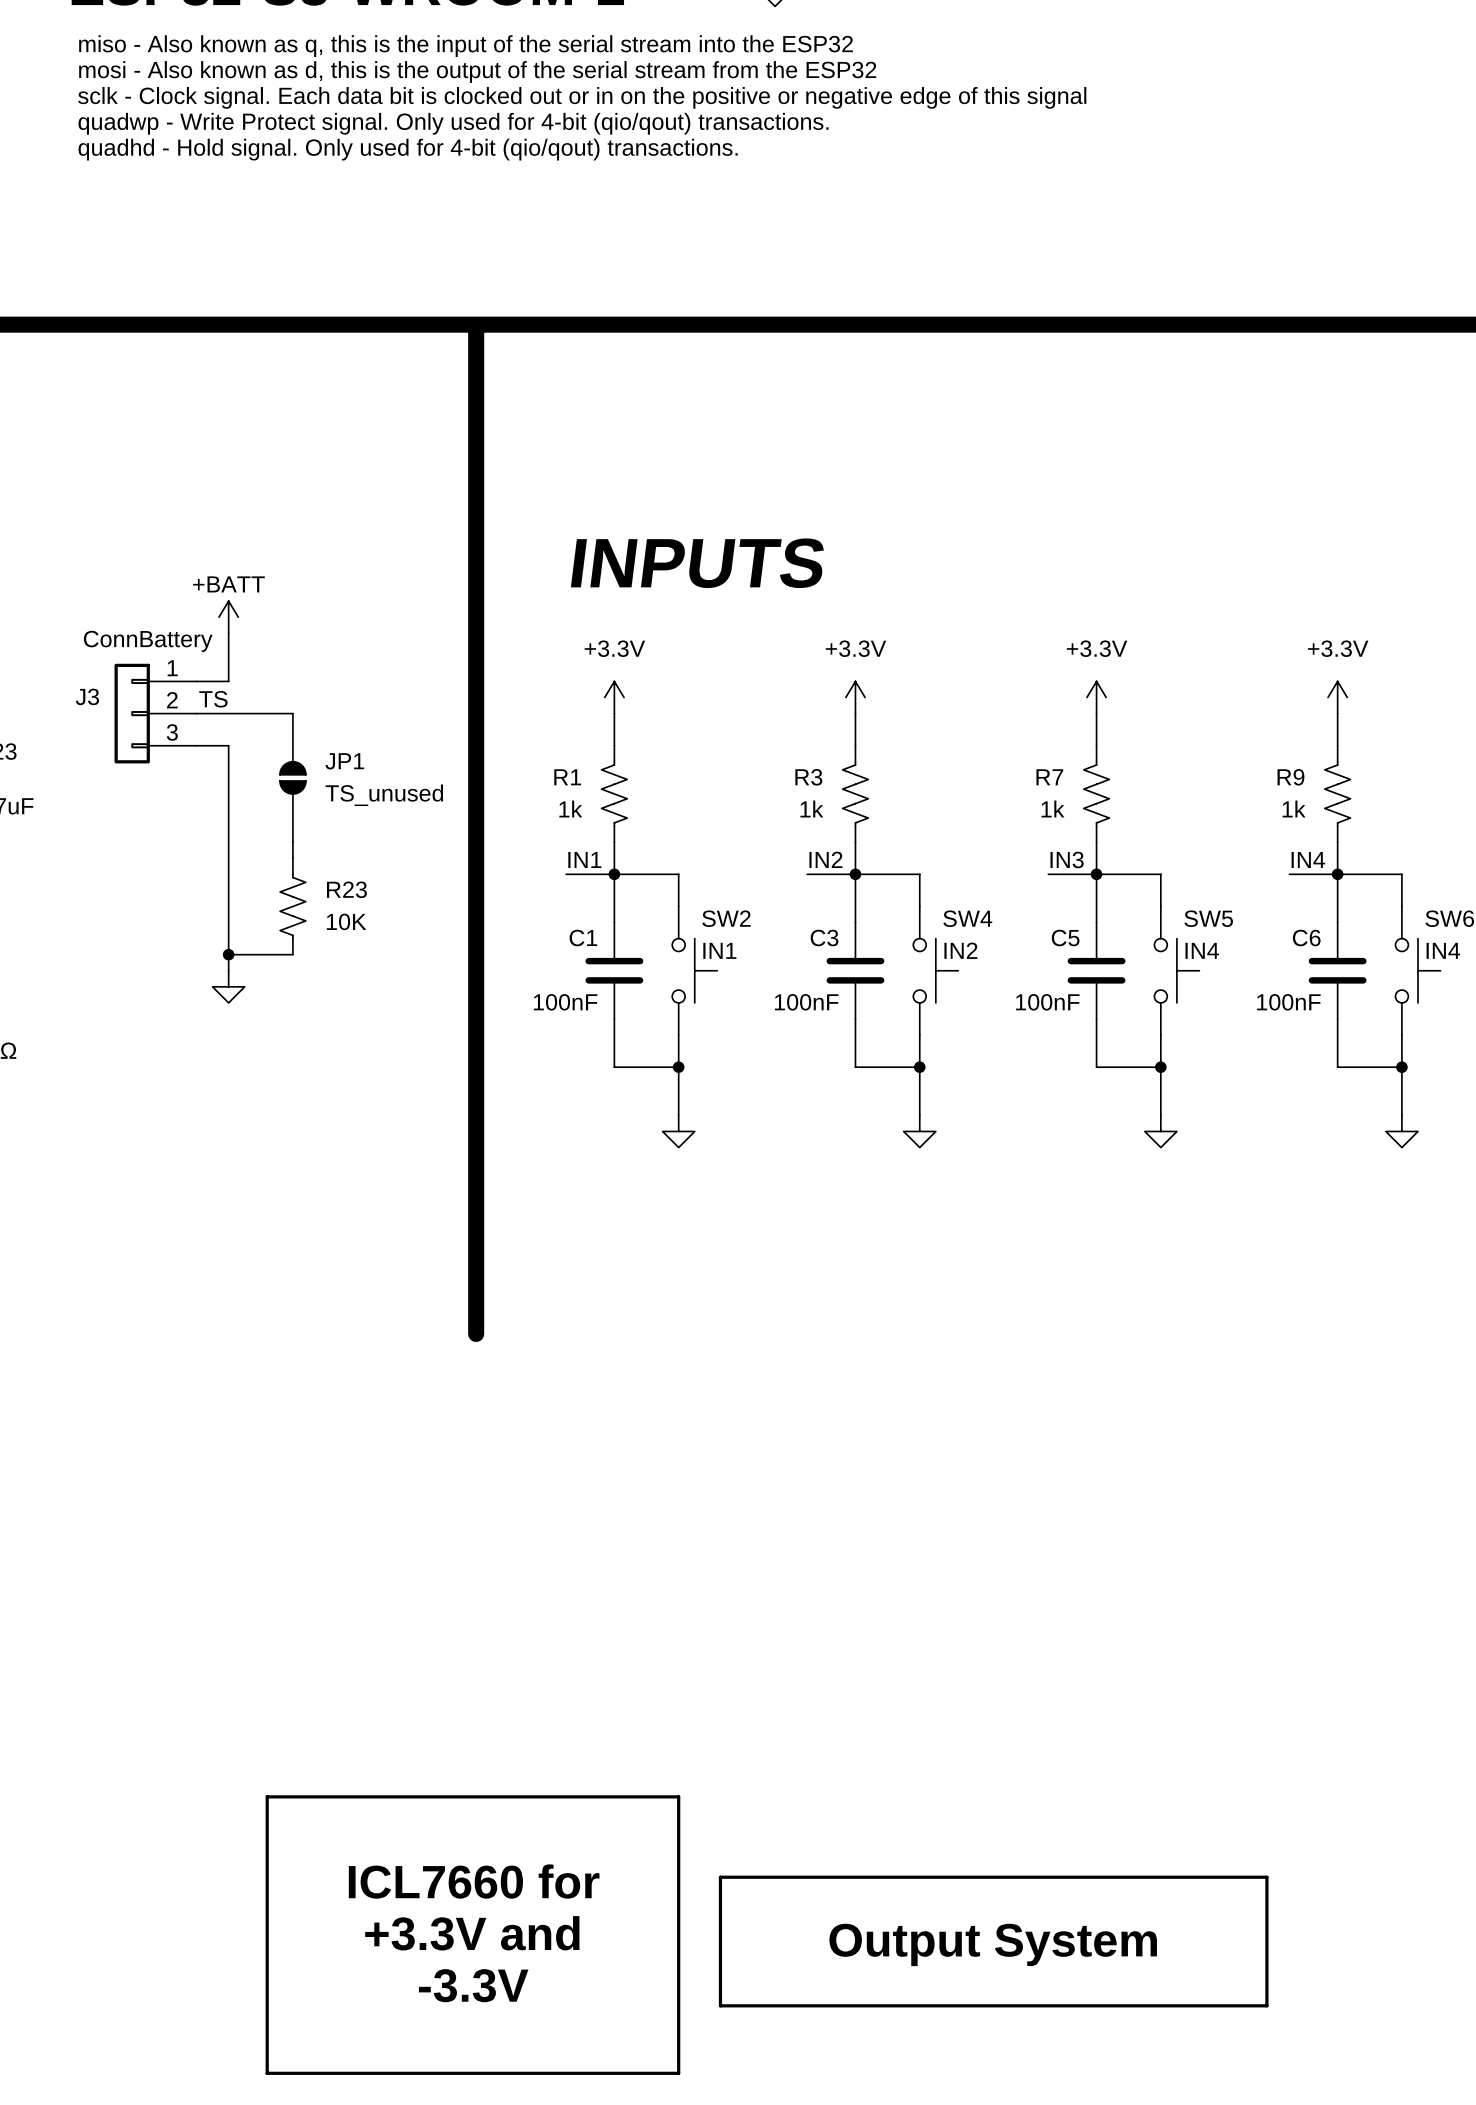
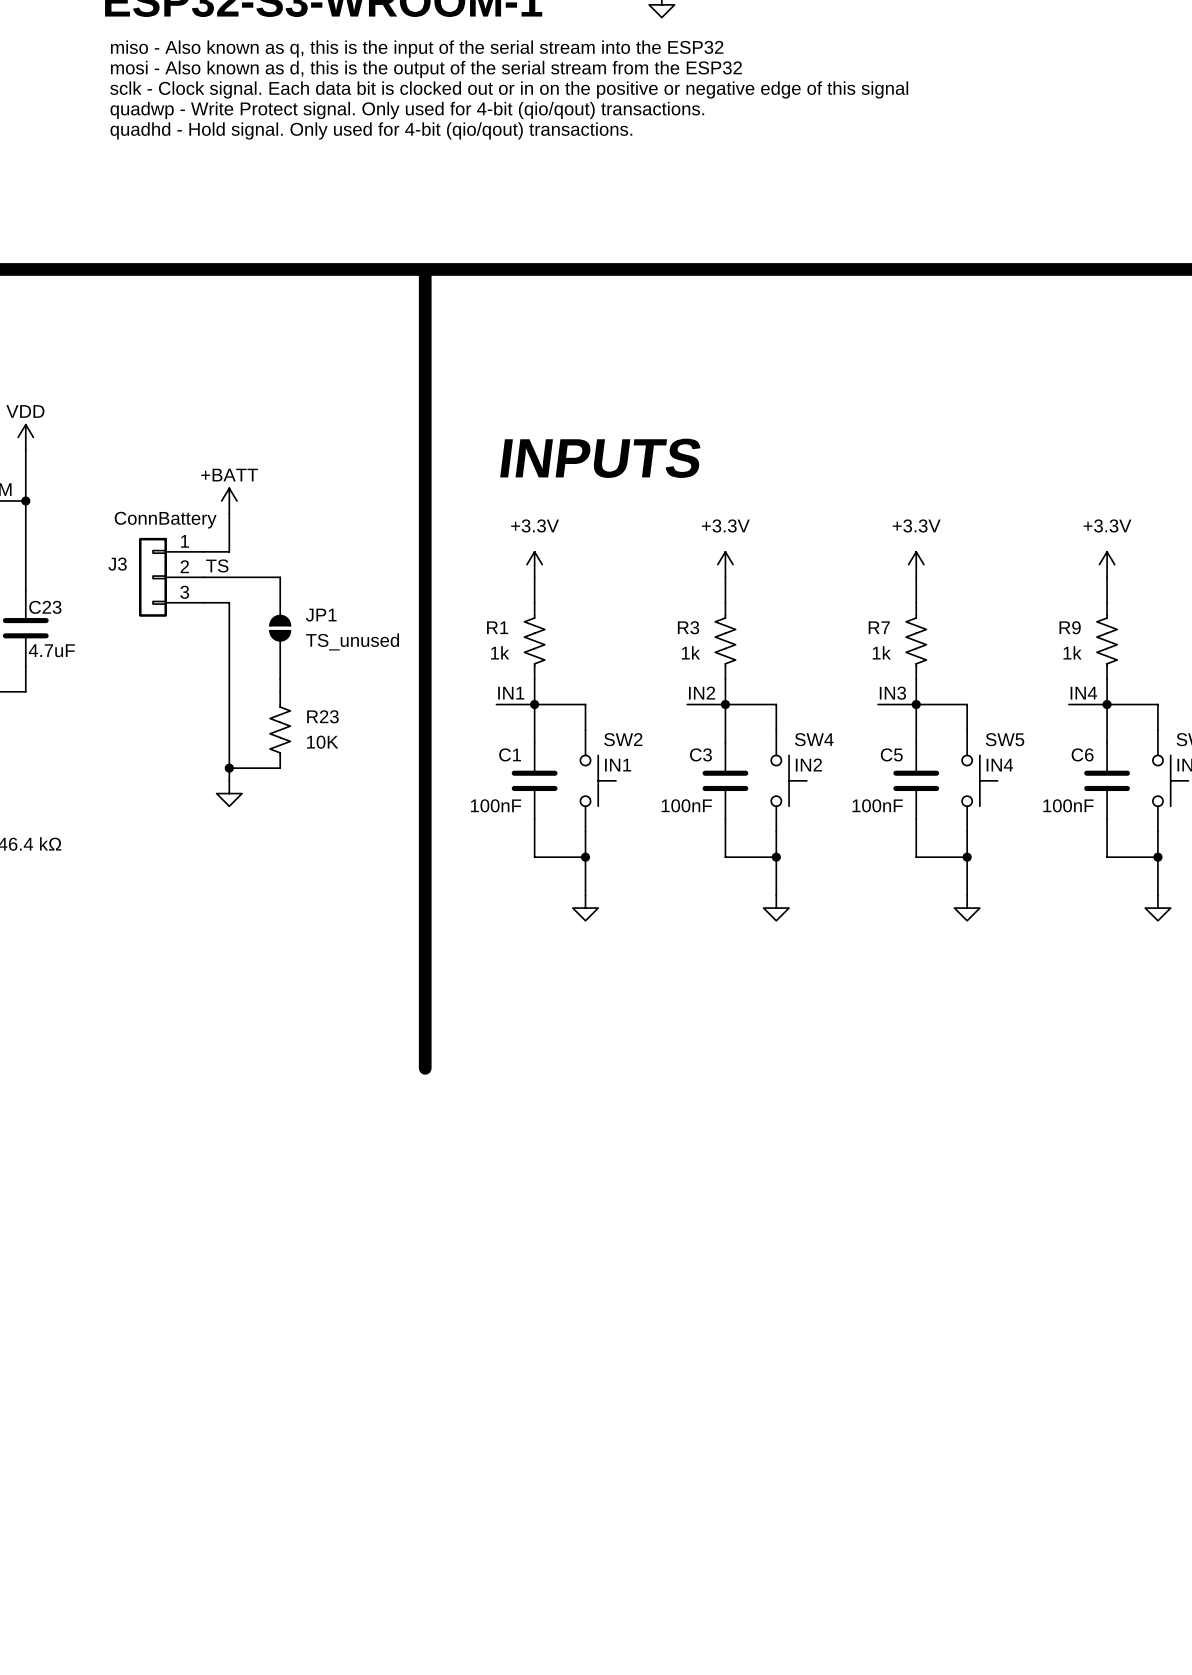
line: (267, 1796) (678, 1796) (678, 2073) (267, 2073) (267, 1796) -> none
line: (720, 1877) (1266, 1877) (1266, 2005) (720, 2005) (720, 1877) -> none
text: ICL7660 for (474, 1881) -> none
text: +3.3V and (472, 1933) -> none
text: Output System (993, 1944) -> none
text: -3.3V (473, 1985) -> none

